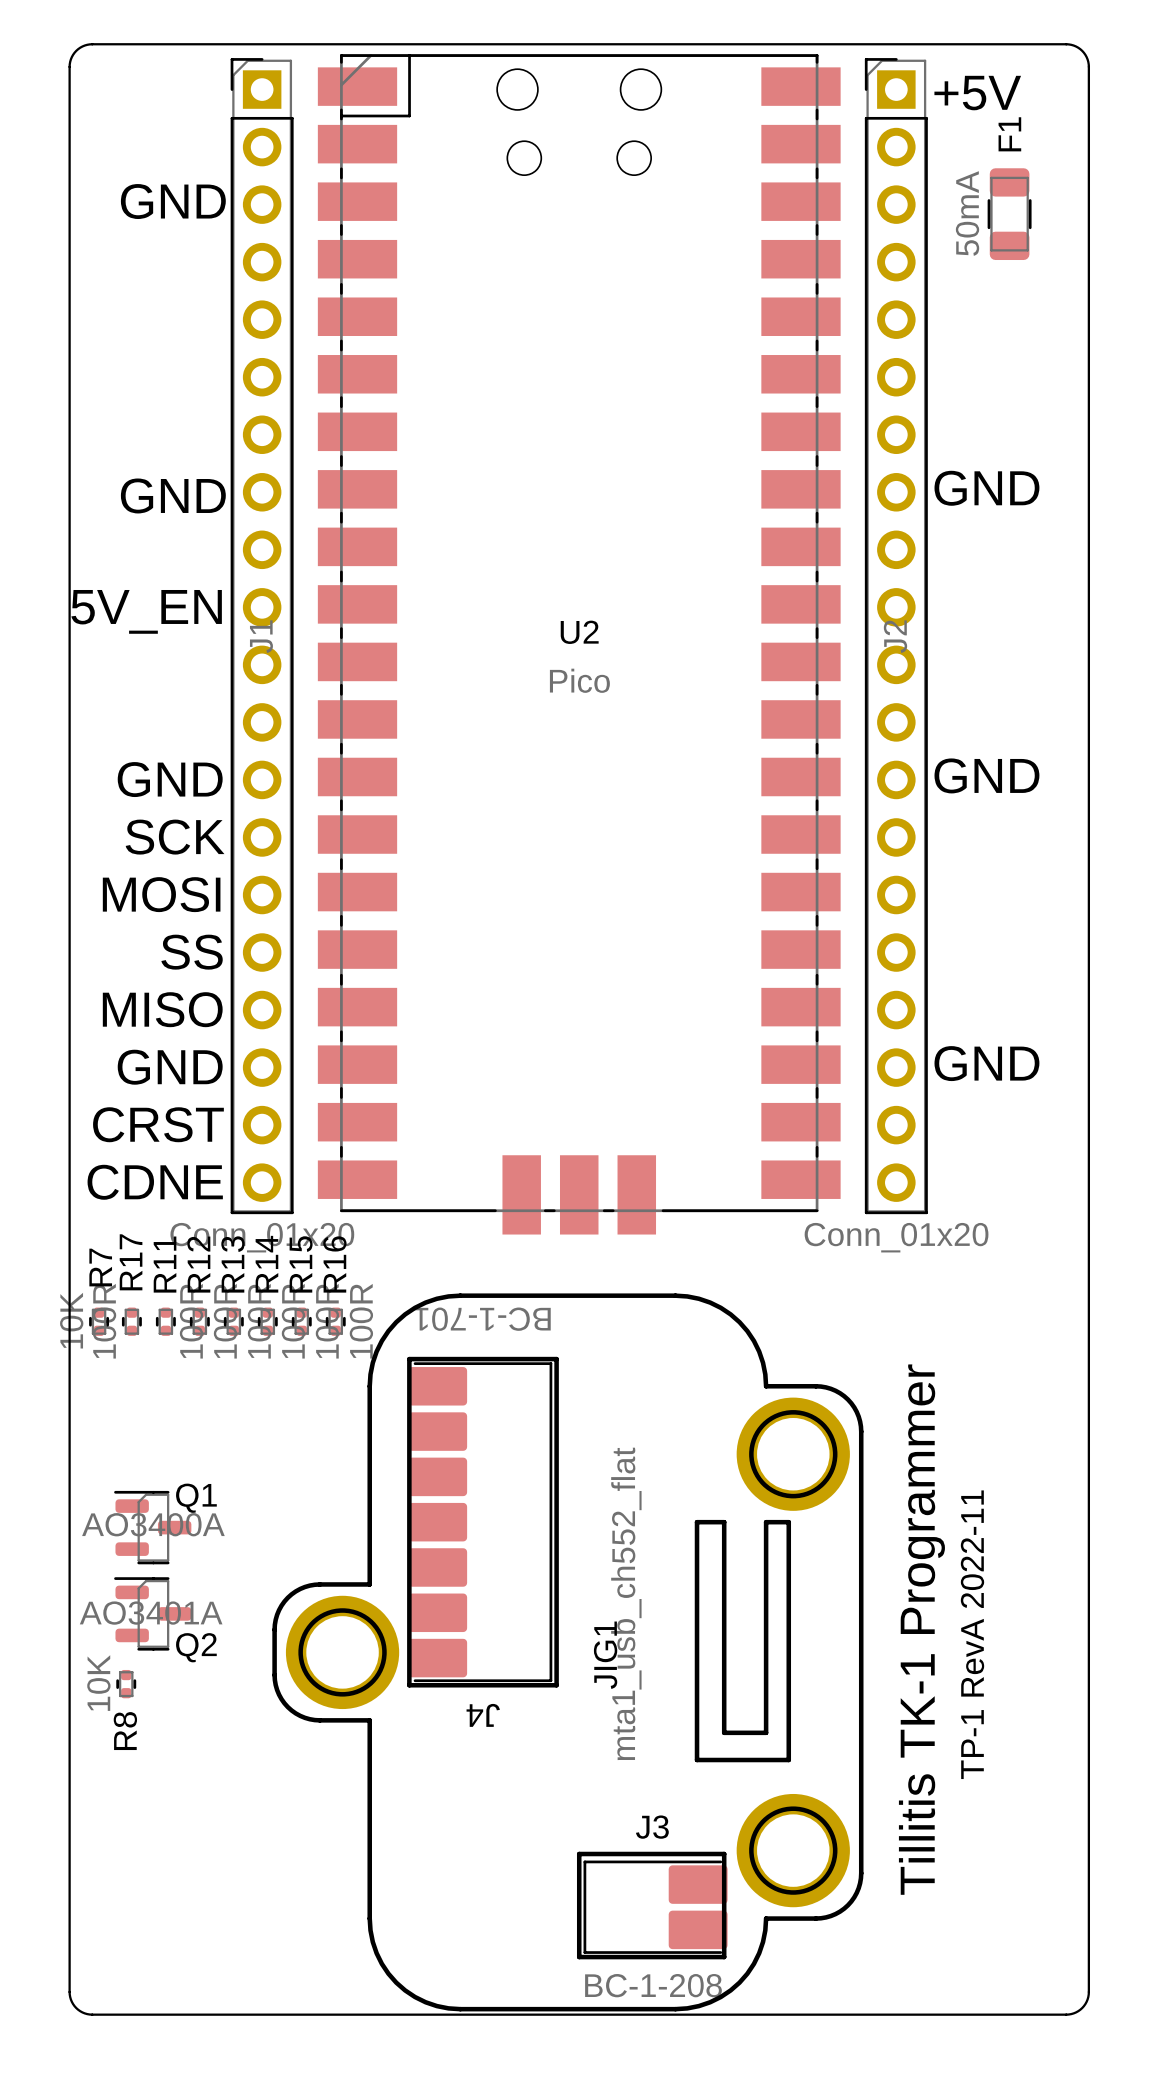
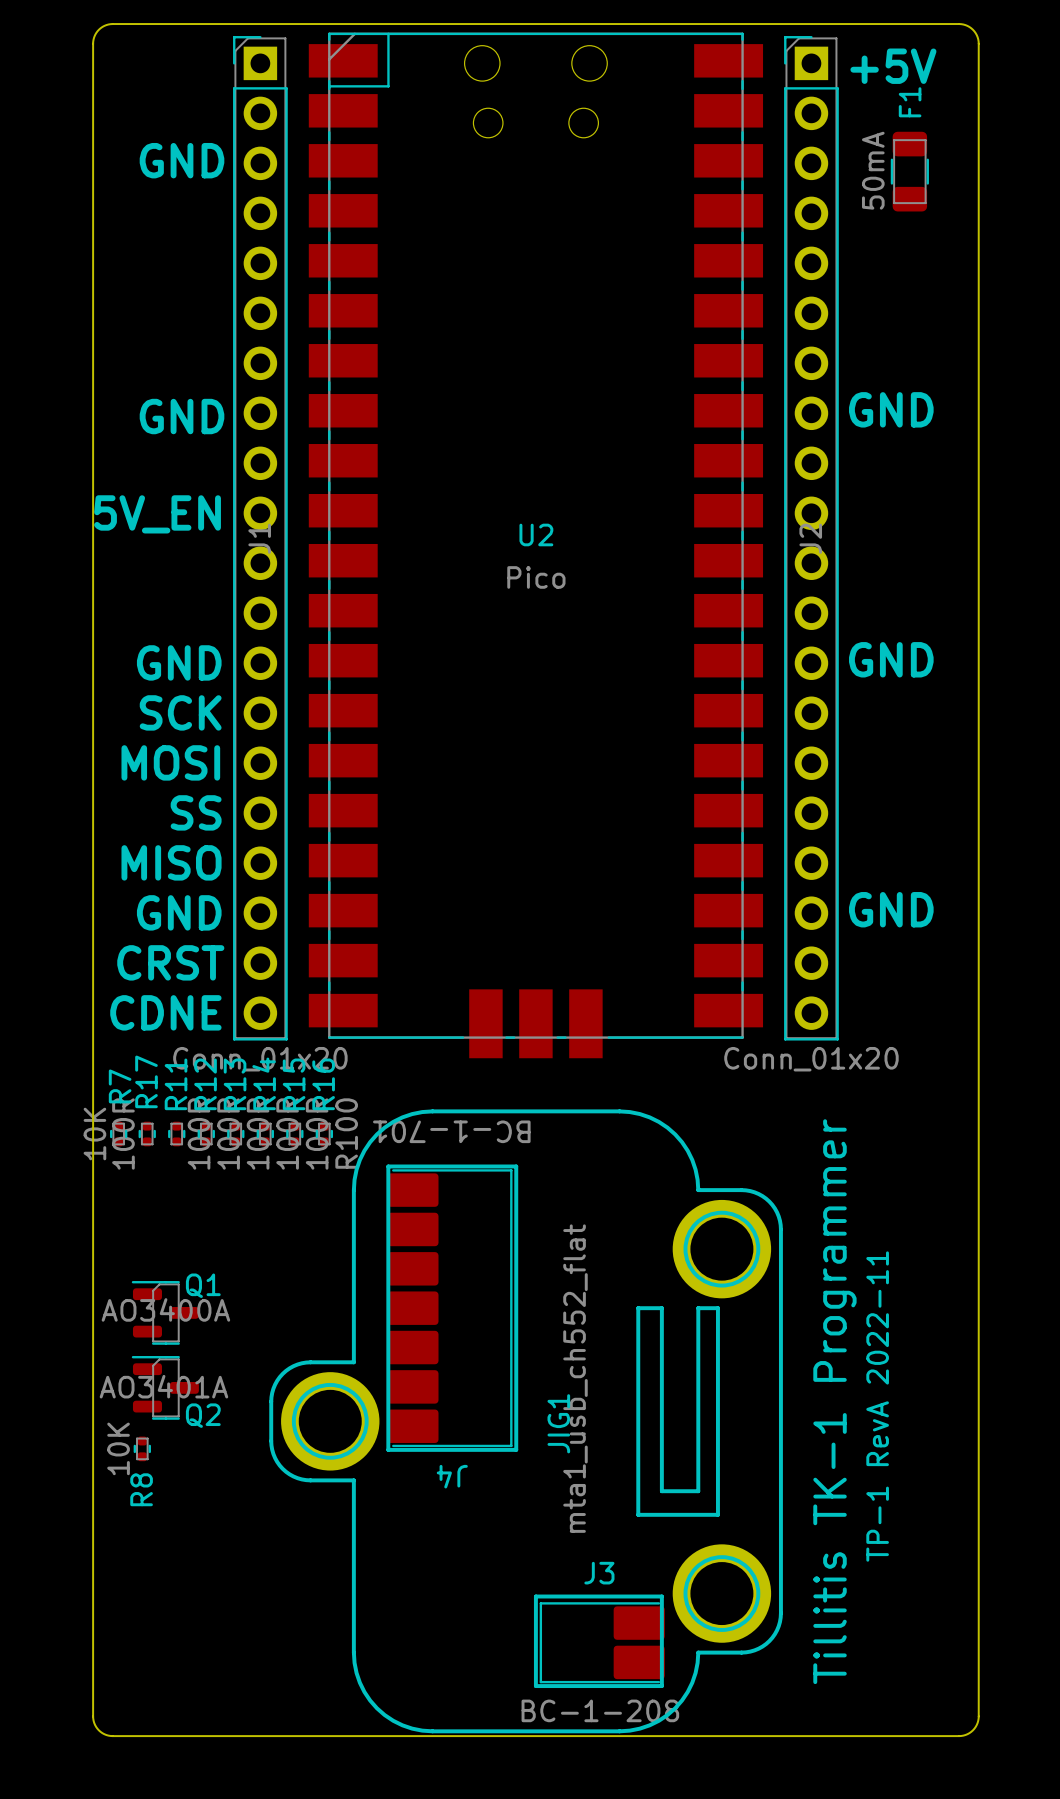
R16 value: 100R (361, 1321) -> R100 (346, 1133)

